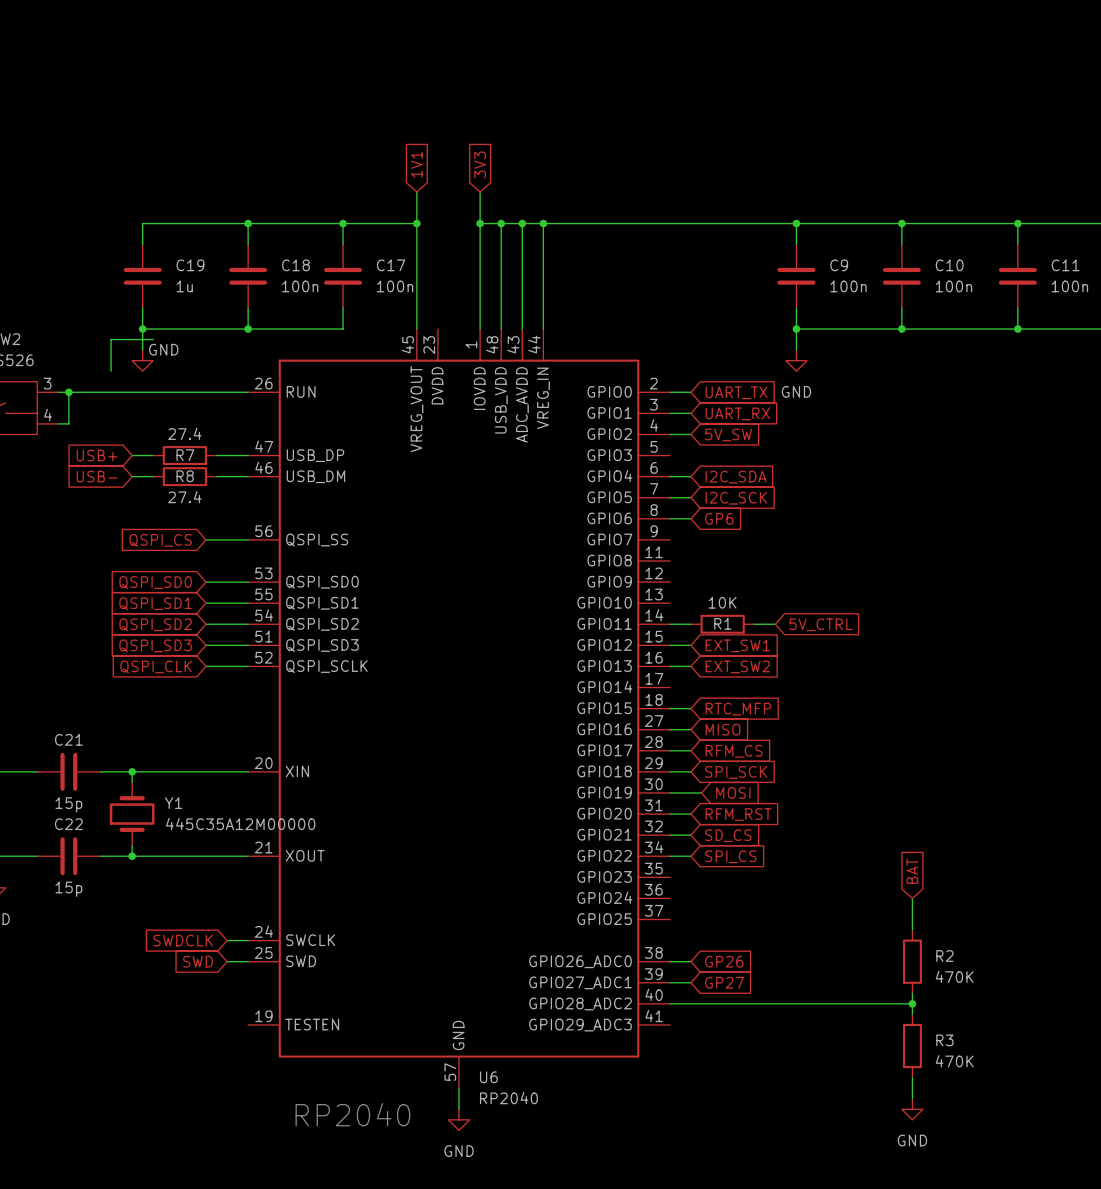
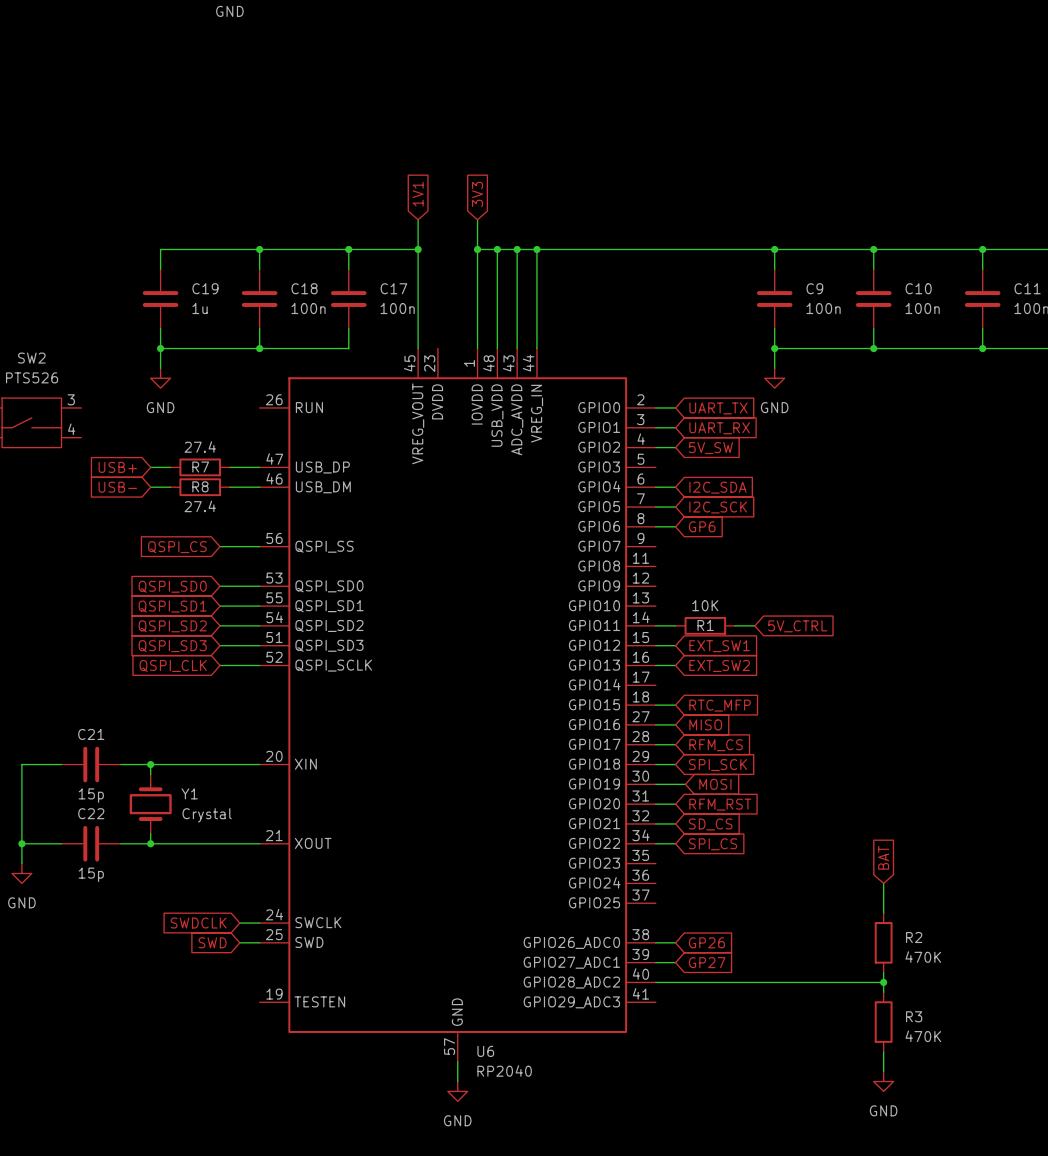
wire: (153, 339) (111, 339) (111, 371) -> none
power symbol text position: GND (163, 349) -> GND (160, 407)
wire: (58, 392) (248, 392) -> none
wire: (68, 392) (68, 423) (58, 423) -> none
junction: (68, 392) -> none
Y1 value: 445C35A12M00000 (240, 823) -> Crystal (207, 815)
text: RP2040 (352, 1114) -> none

